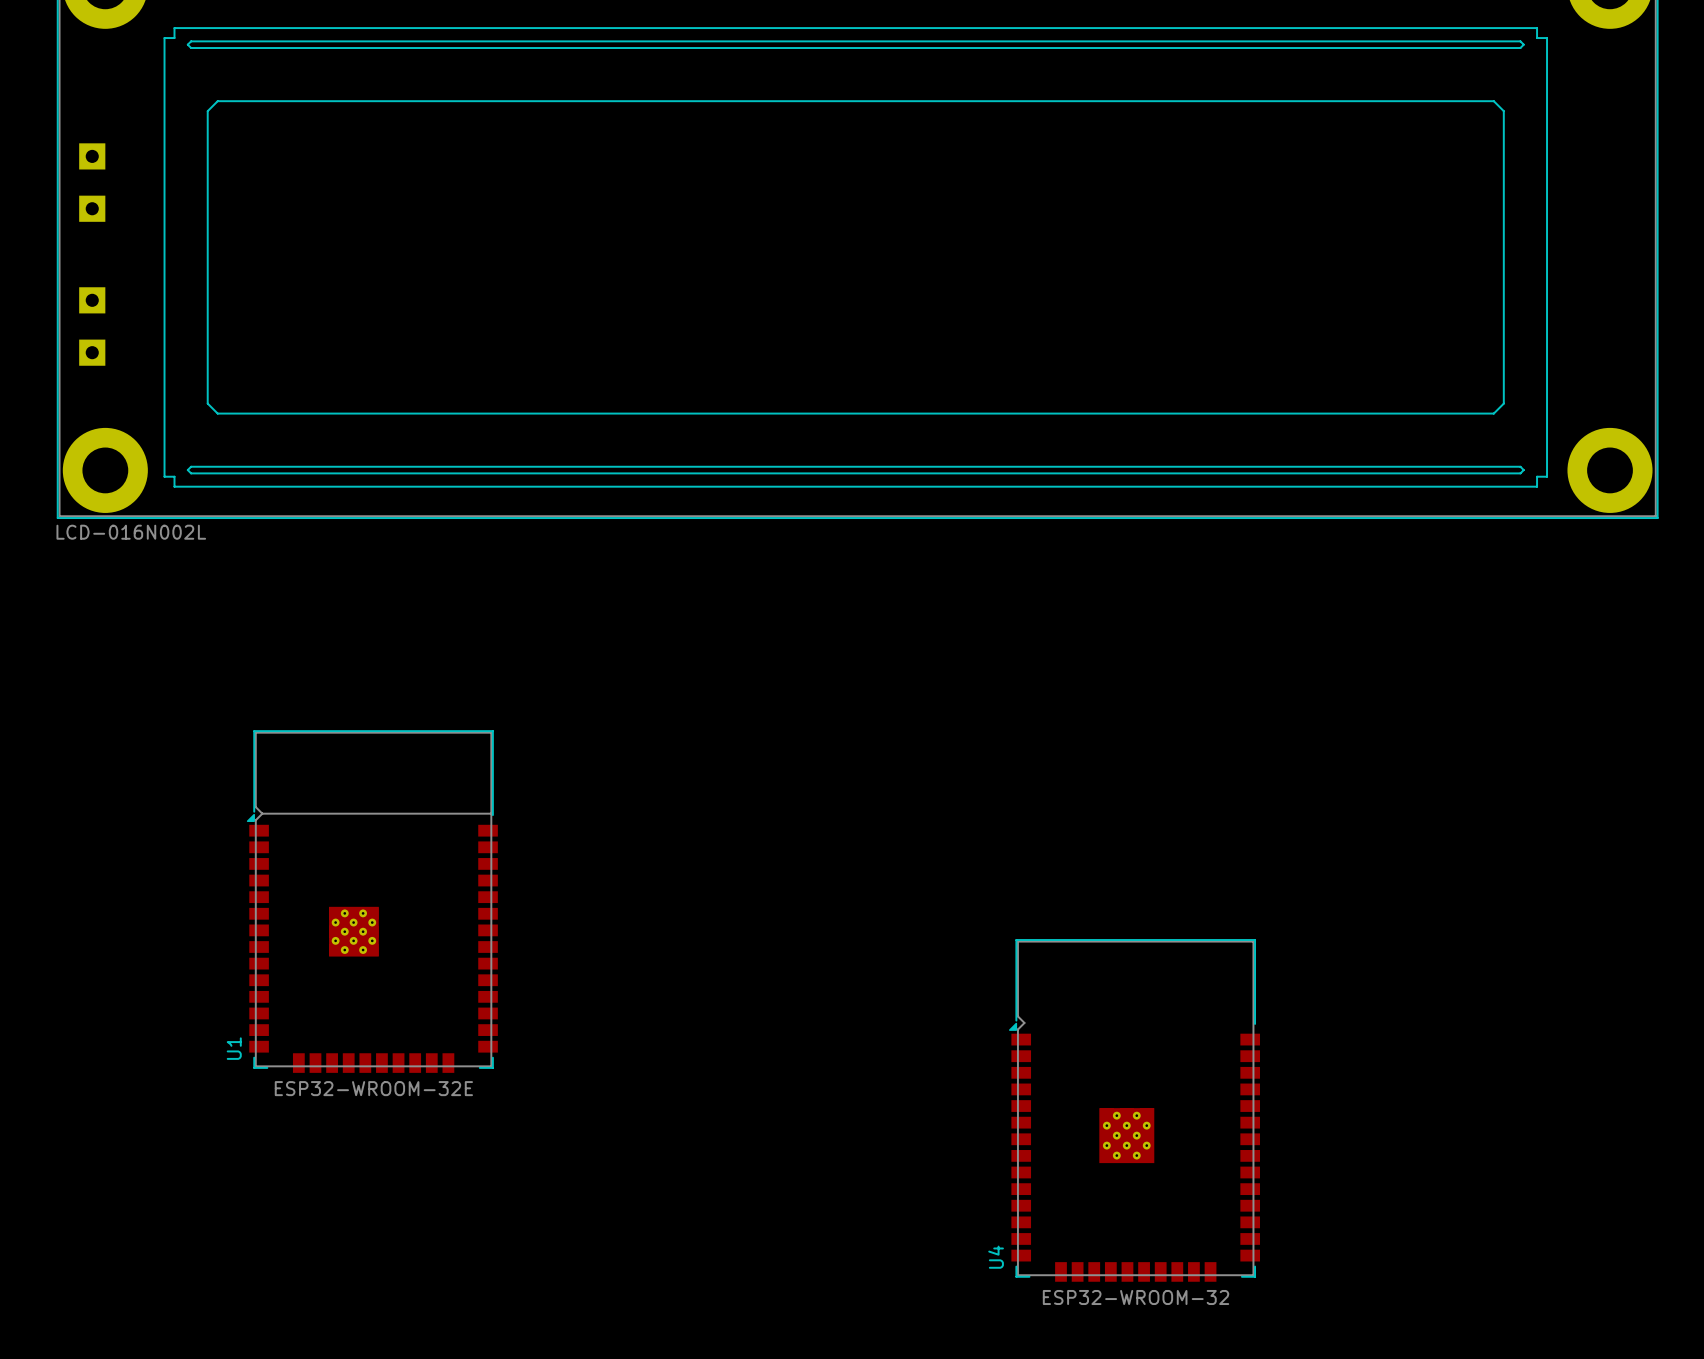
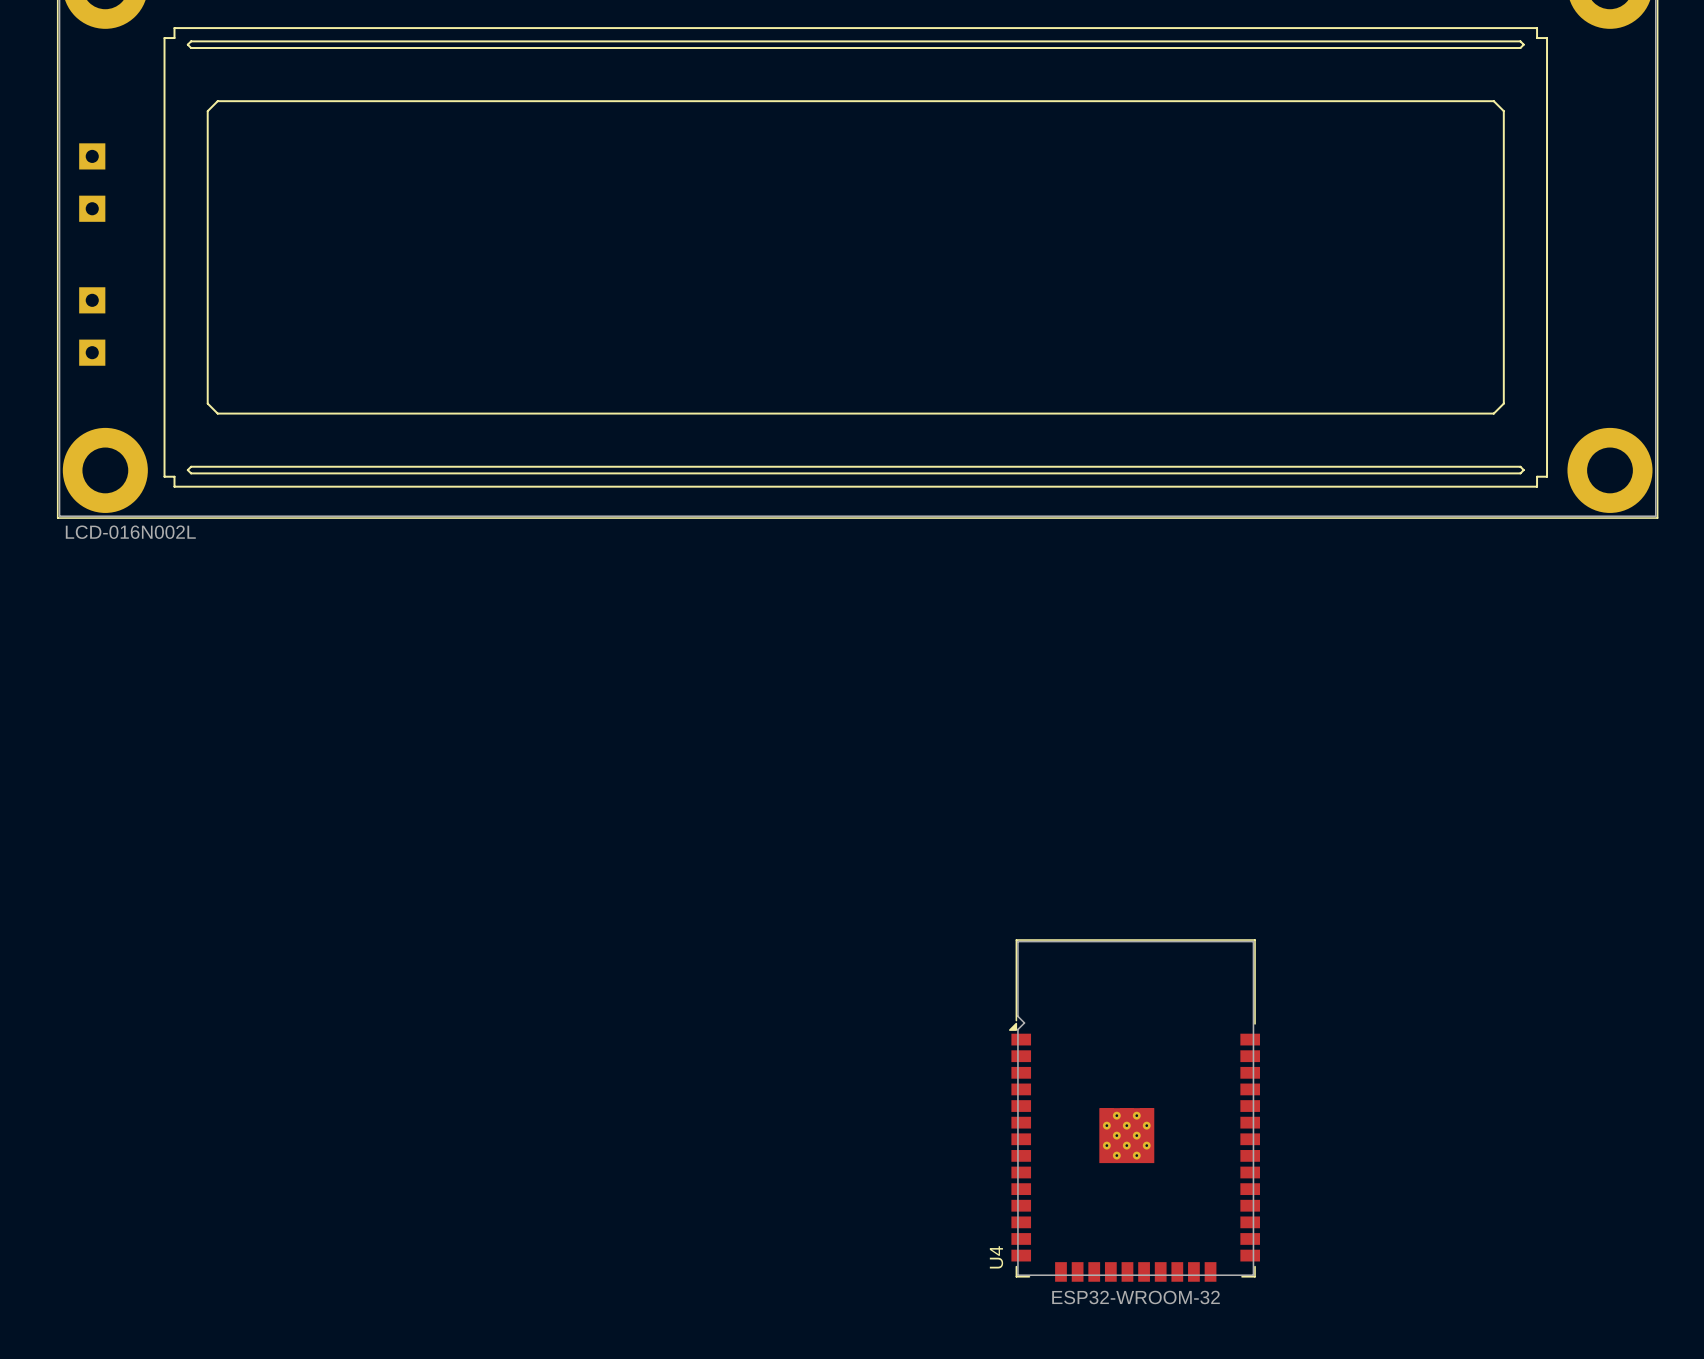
U1: ESP32-WROOM-32E (372, 901) -> none

